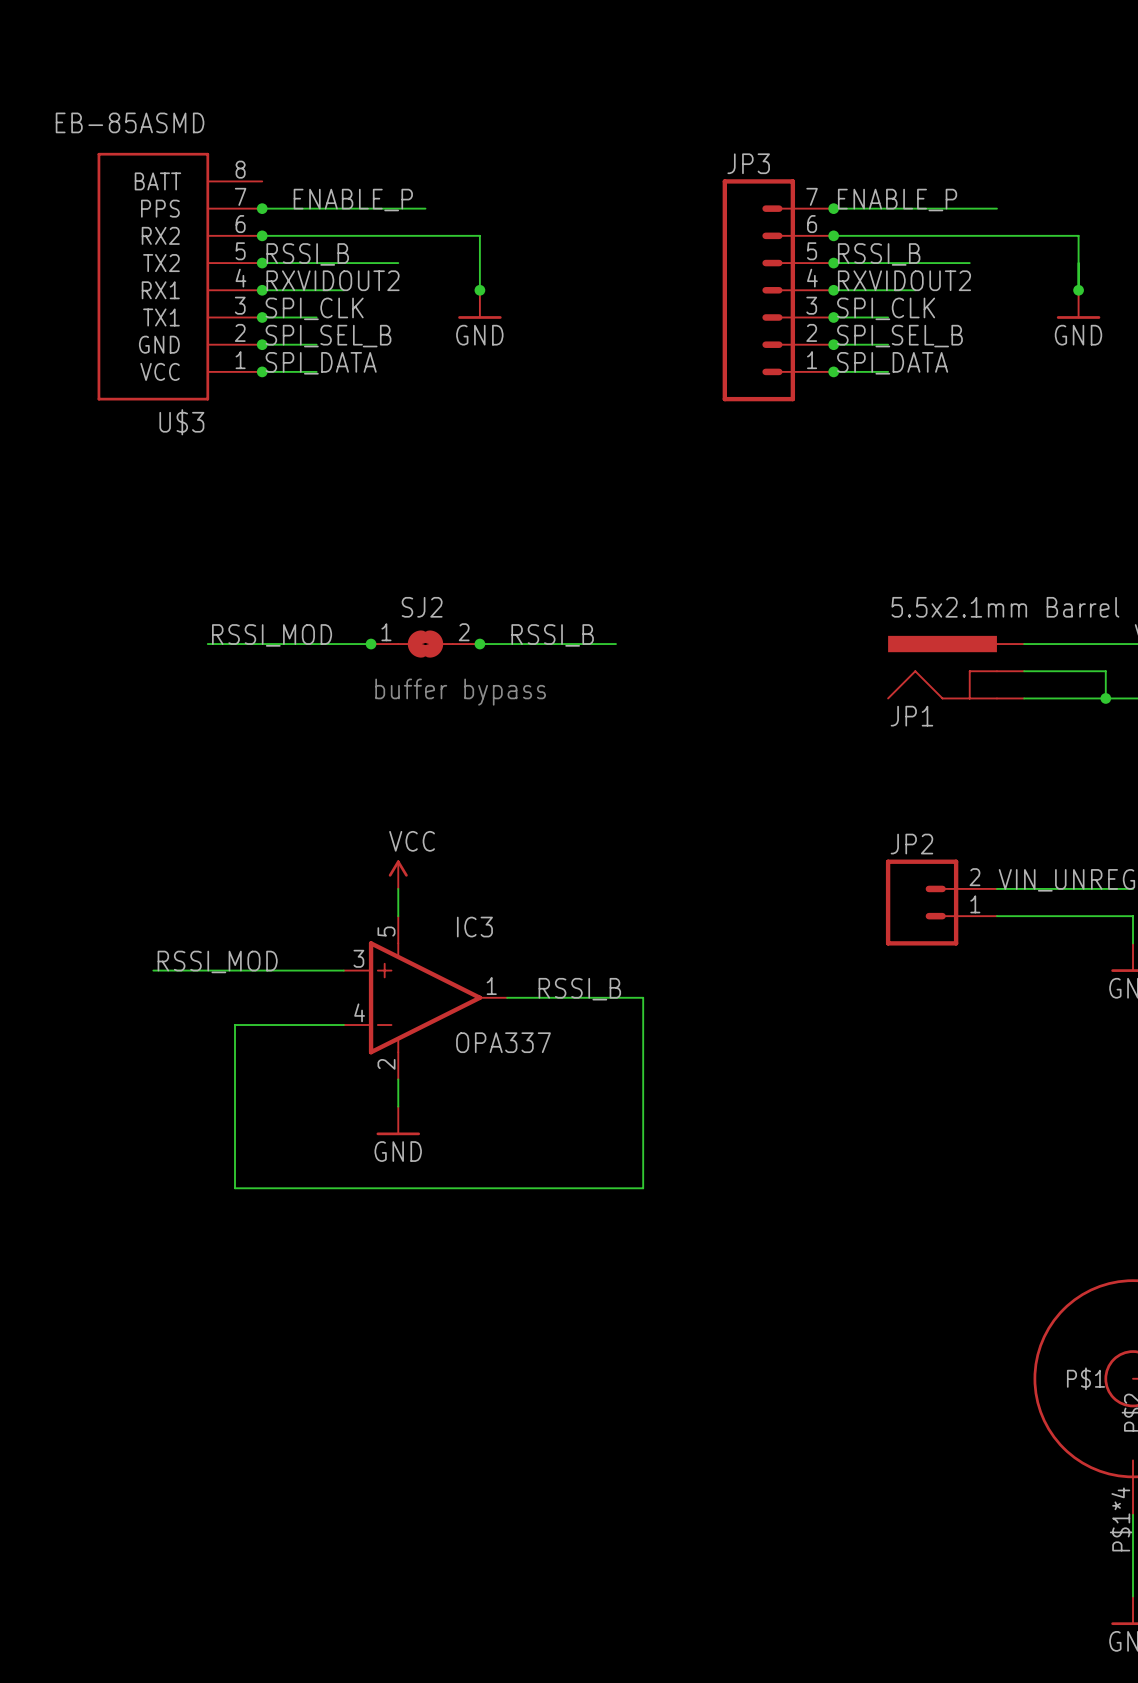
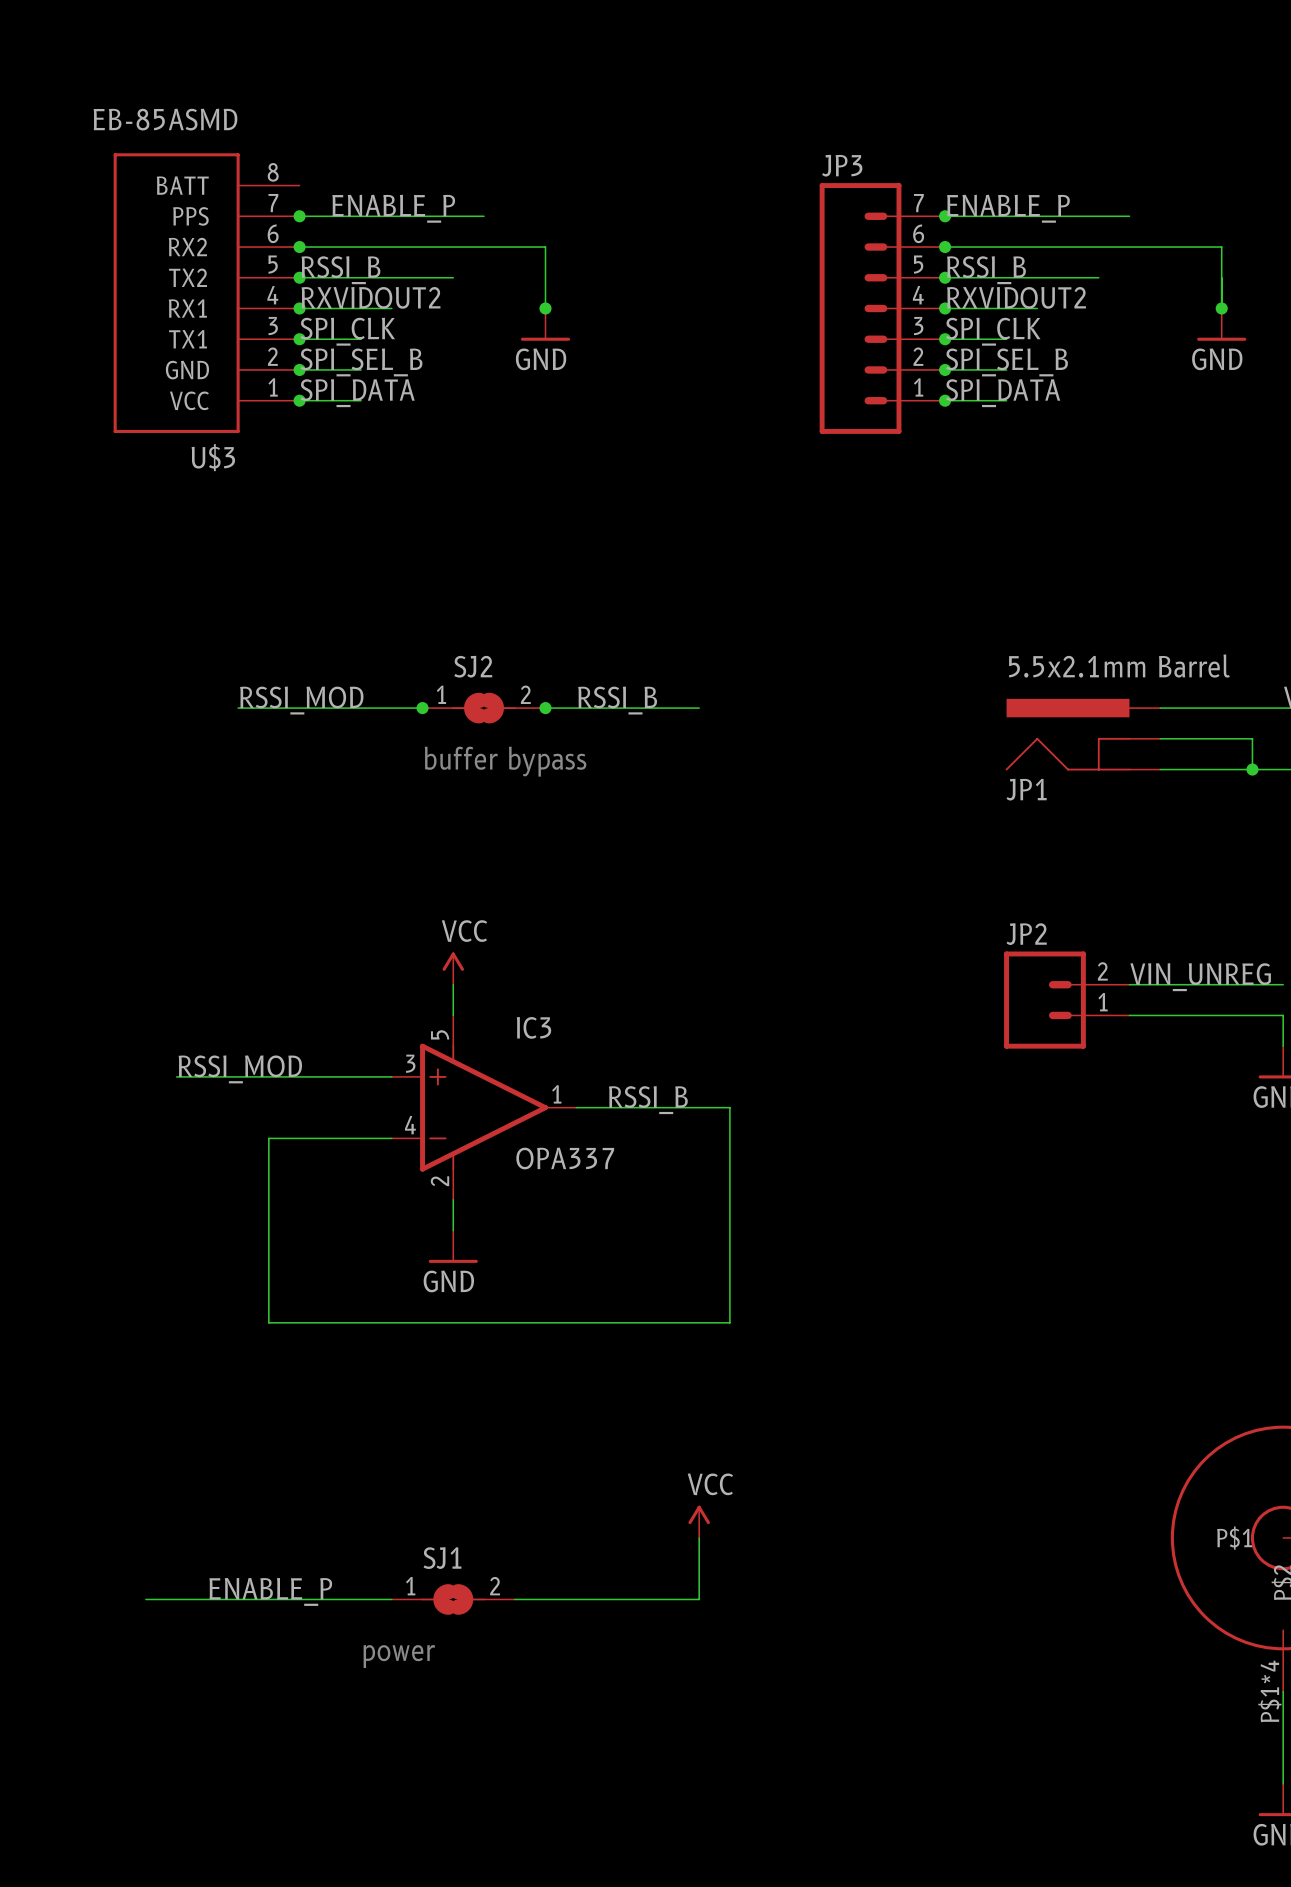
power symbol: none -> VCC (699, 1521)
wire: none -> (699, 1537) (699, 1599) (514, 1599)
label: none -> ENABLE_P (270, 1591)
wire: none -> (145, 1599) (391, 1599)
SJ1: none -> (453, 1599)
text: none -> power (399, 1656)

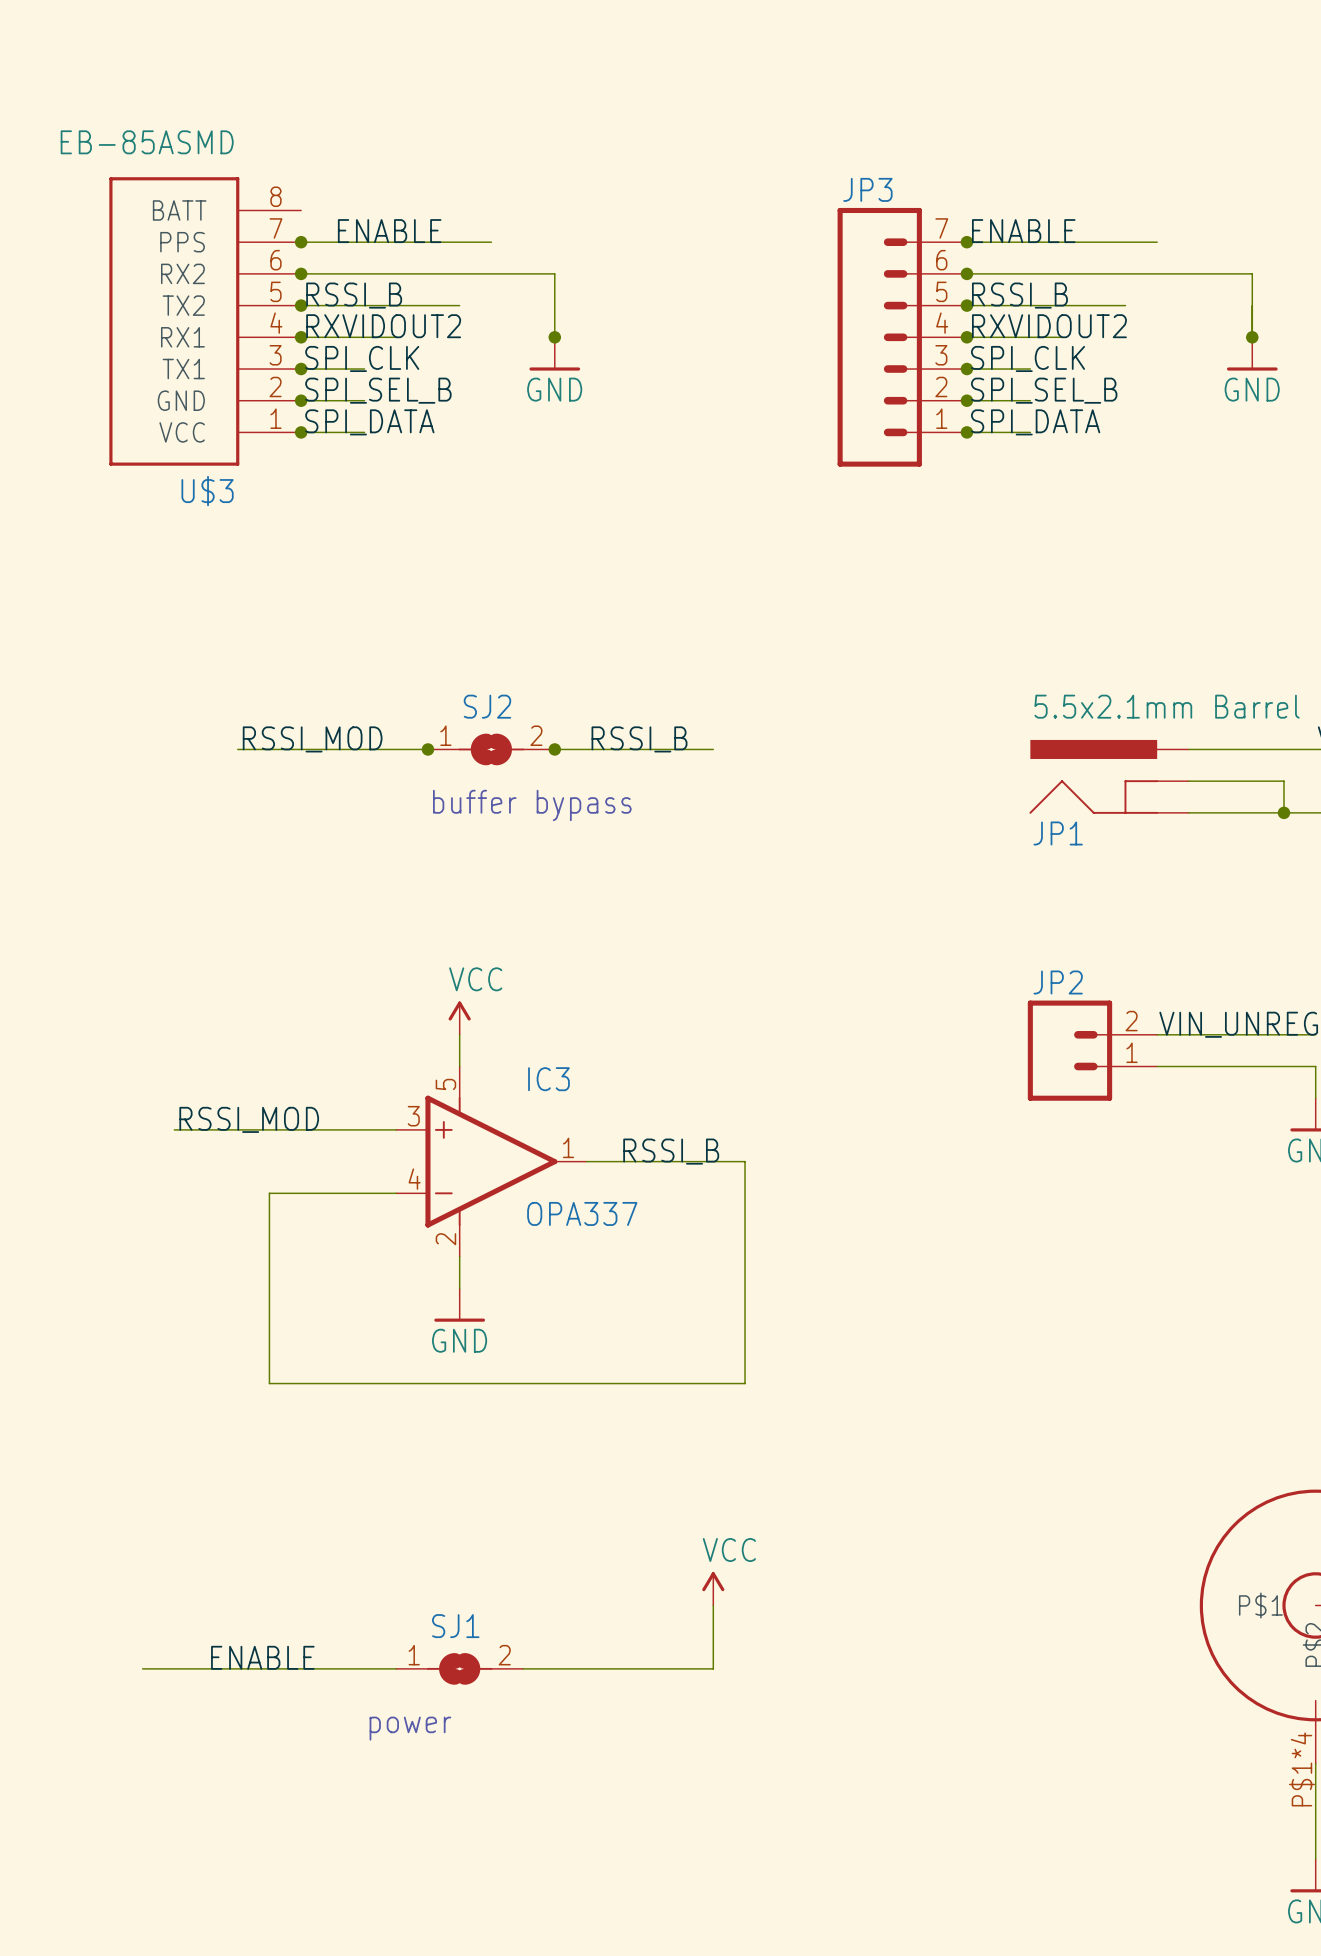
label: ENABLE_P (393, 208) -> ENABLE (389, 231)
label: ENABLE_P (1008, 208) -> ENABLE (1023, 231)
label: ENABLE_P (270, 1591) -> ENABLE (262, 1657)

